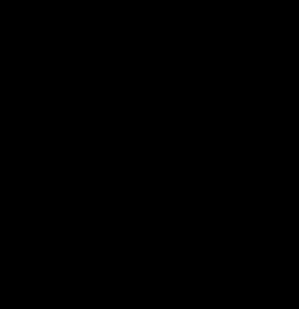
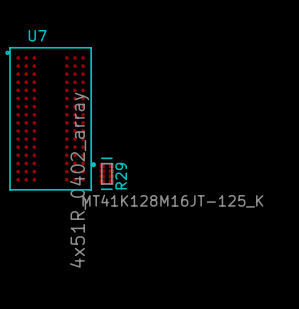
U7: none -> MT41K128M16JT-125_K (48, 118)
R29: none -> 4x51R_0402_array (102, 173)

